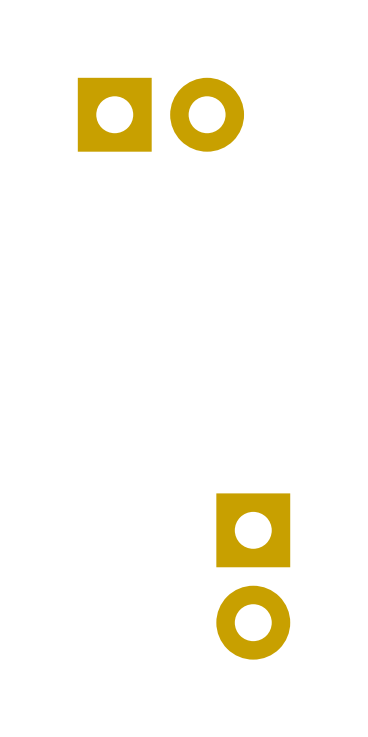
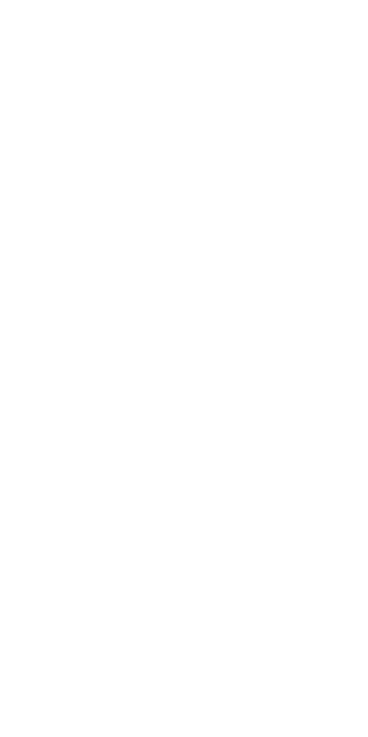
part: (160, 114) -> none
part: (253, 576) -> none

